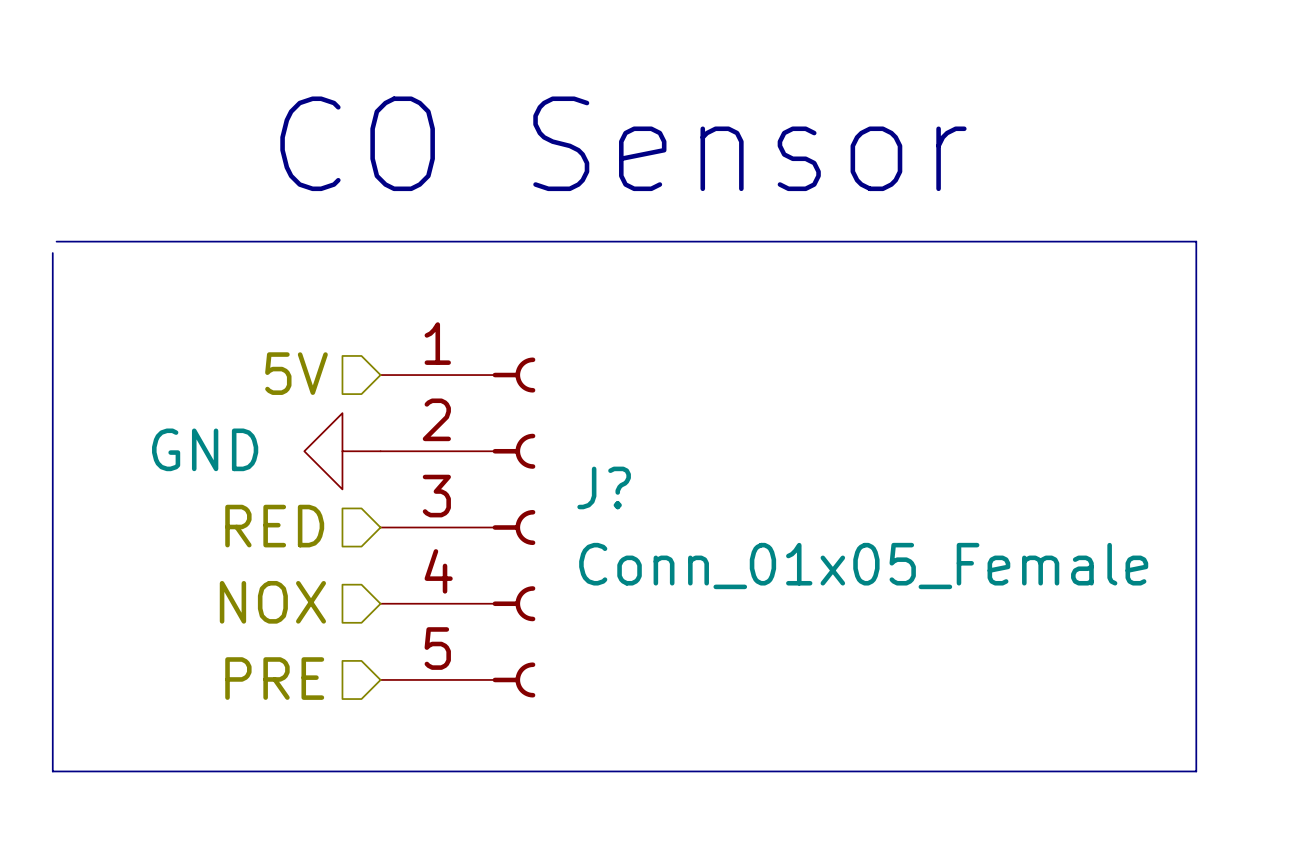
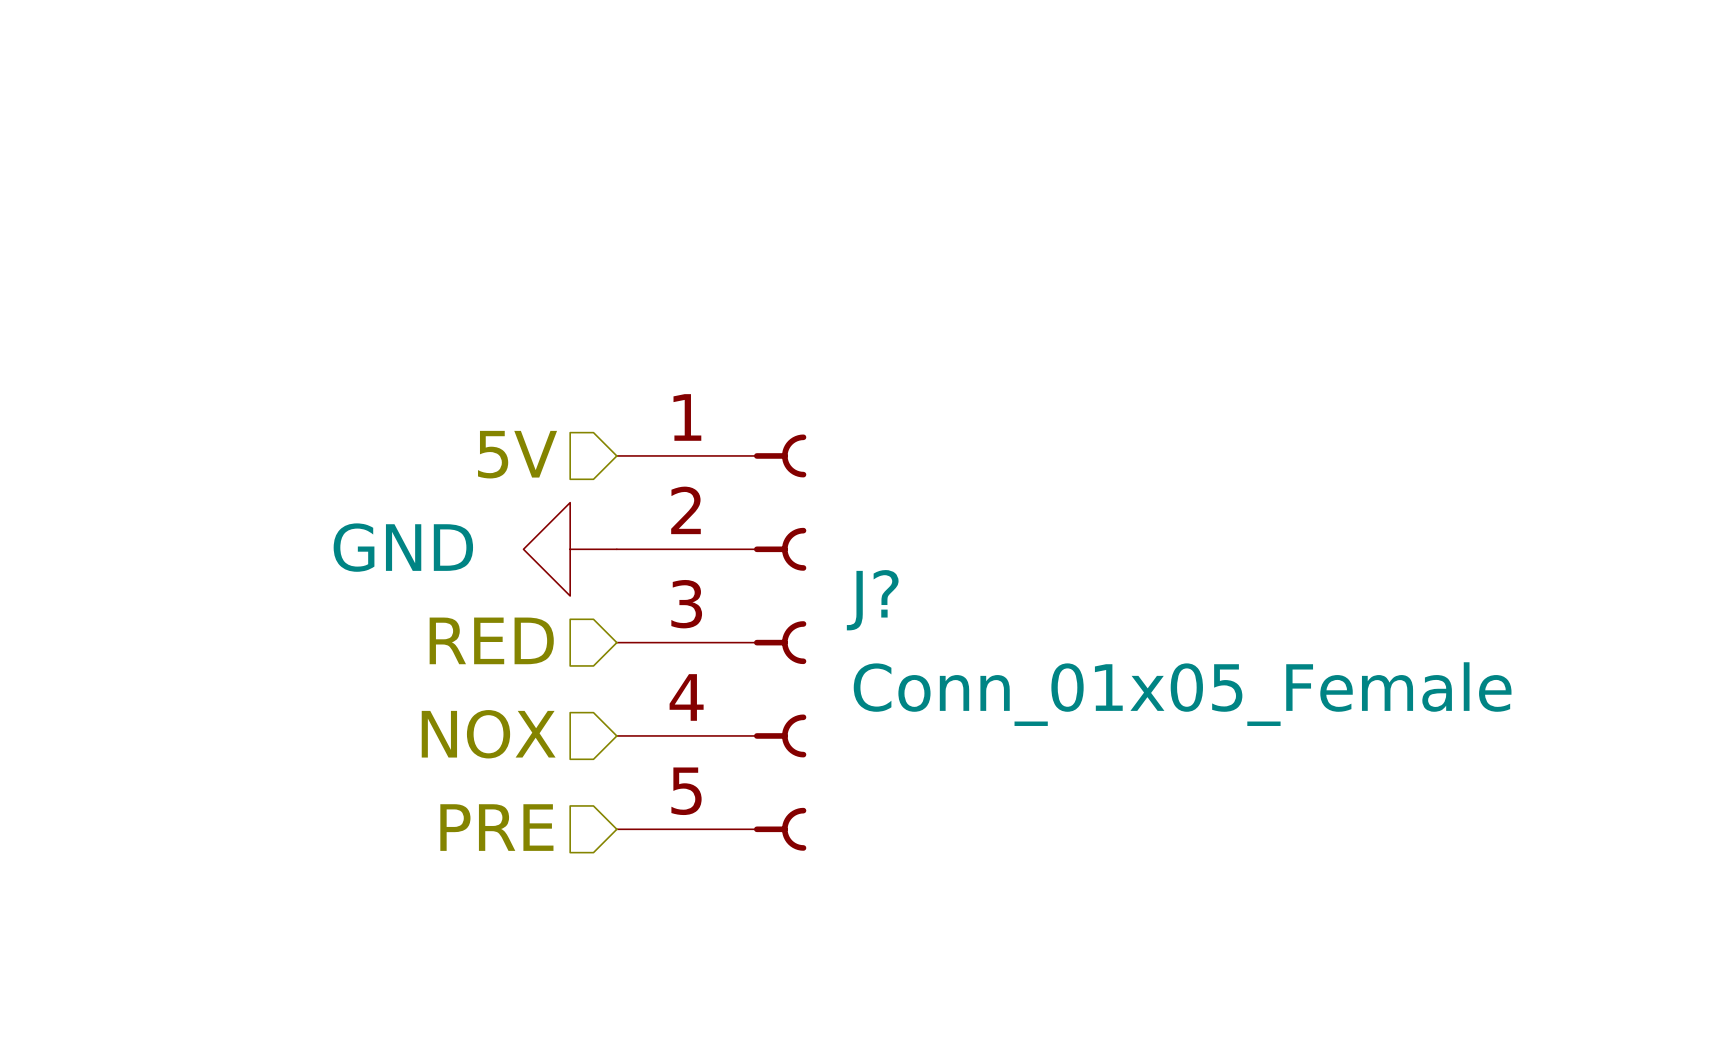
text: CO Sensor (623, 143) -> none
line: (56, 241) (1196, 241) (1196, 771) (52, 771) (52, 253) -> none

